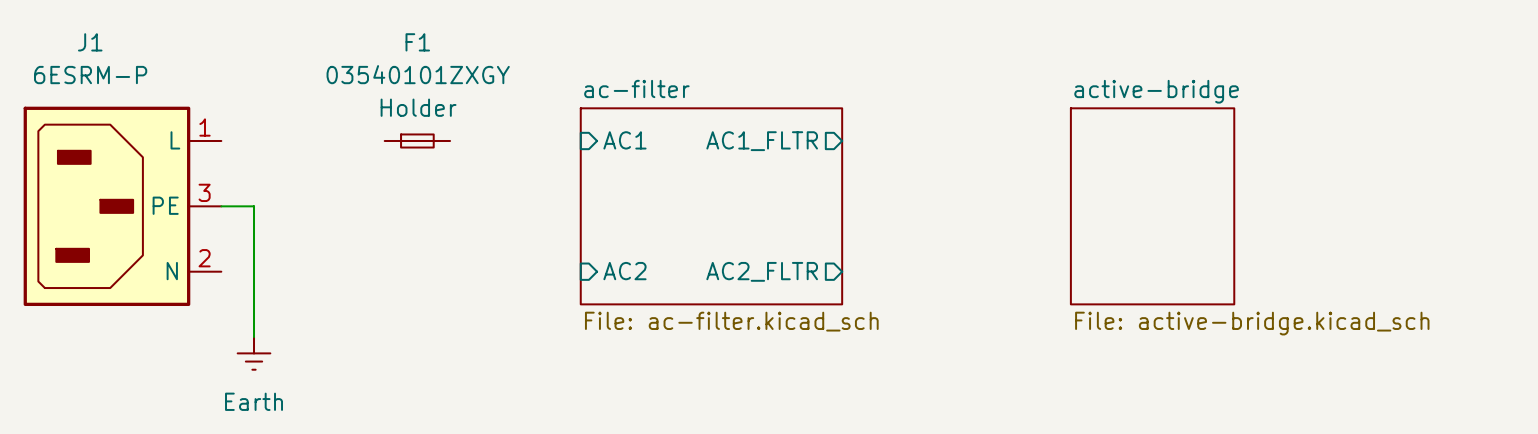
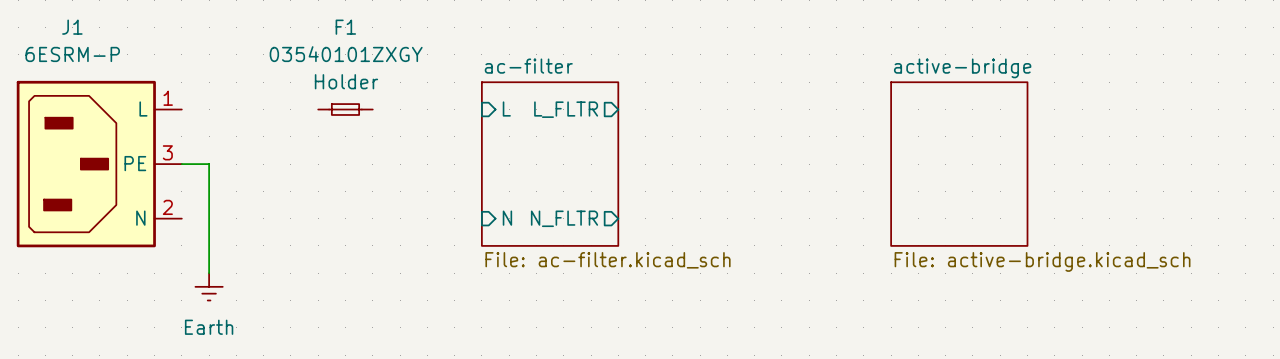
sheet pin: AC1 (624, 140) -> L (506, 109)
sheet pin: AC1_FLTR (762, 141) -> L_FLTR (566, 109)
sheet ac-filter: none -> File: ac-filter.kicad_sch (550, 164)
sheet ac-filter: File: ac-filter.kicad_sch (711, 206) -> none
sheet pin: AC2 (624, 271) -> N (507, 218)
sheet pin: AC2_FLTR (762, 271) -> N_FLTR (564, 218)

